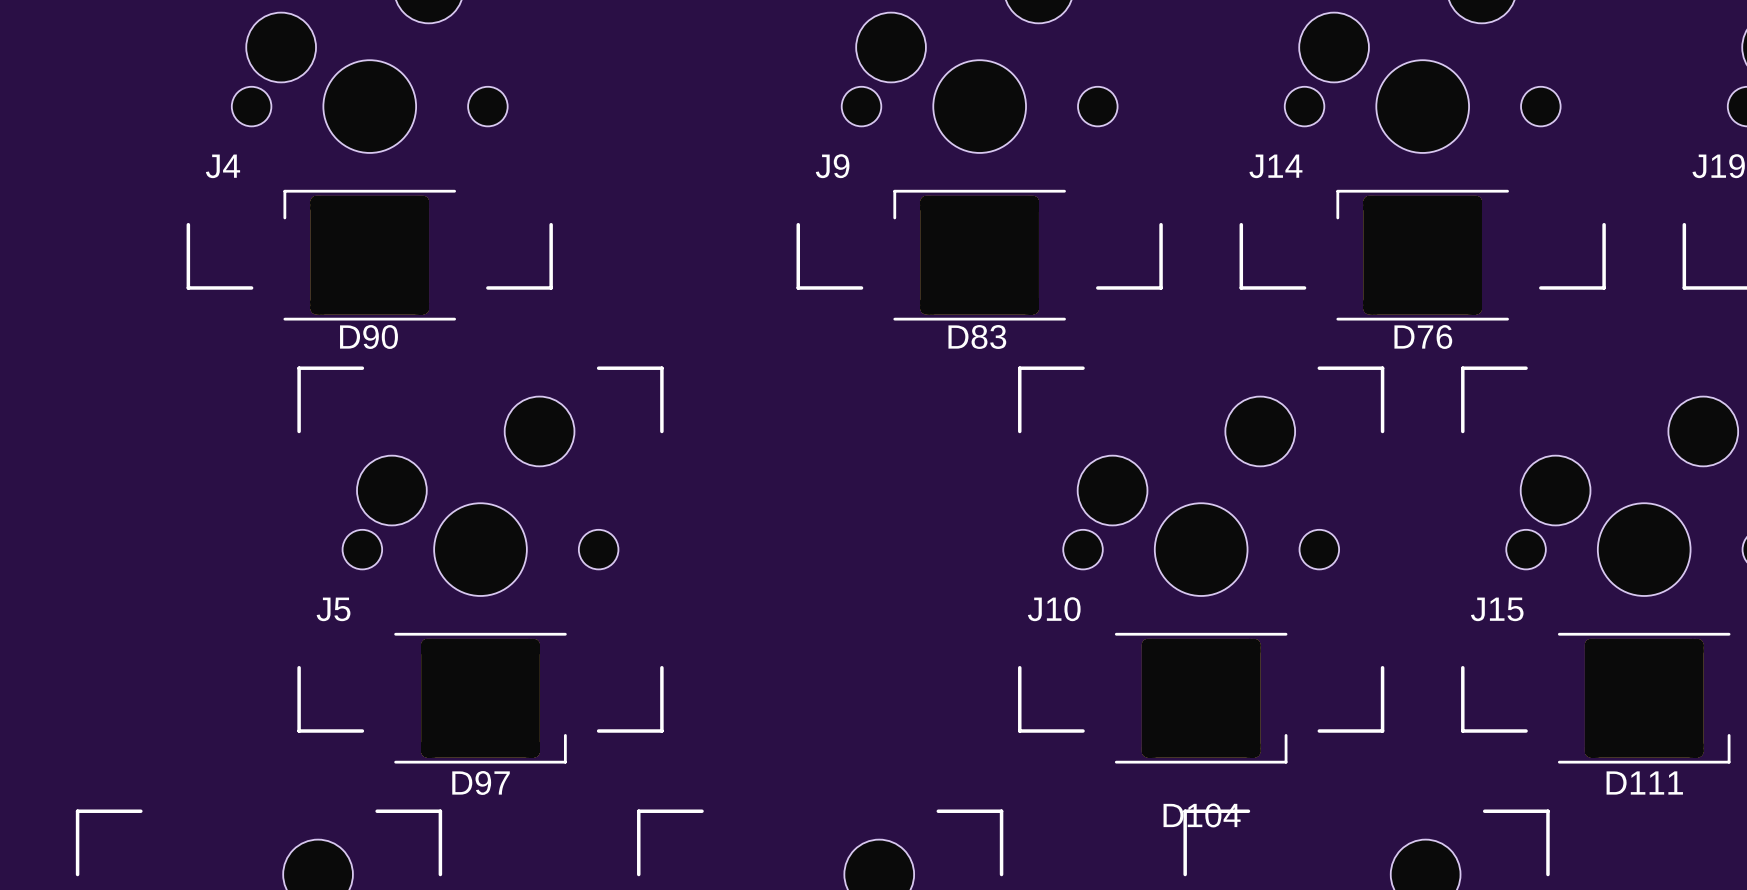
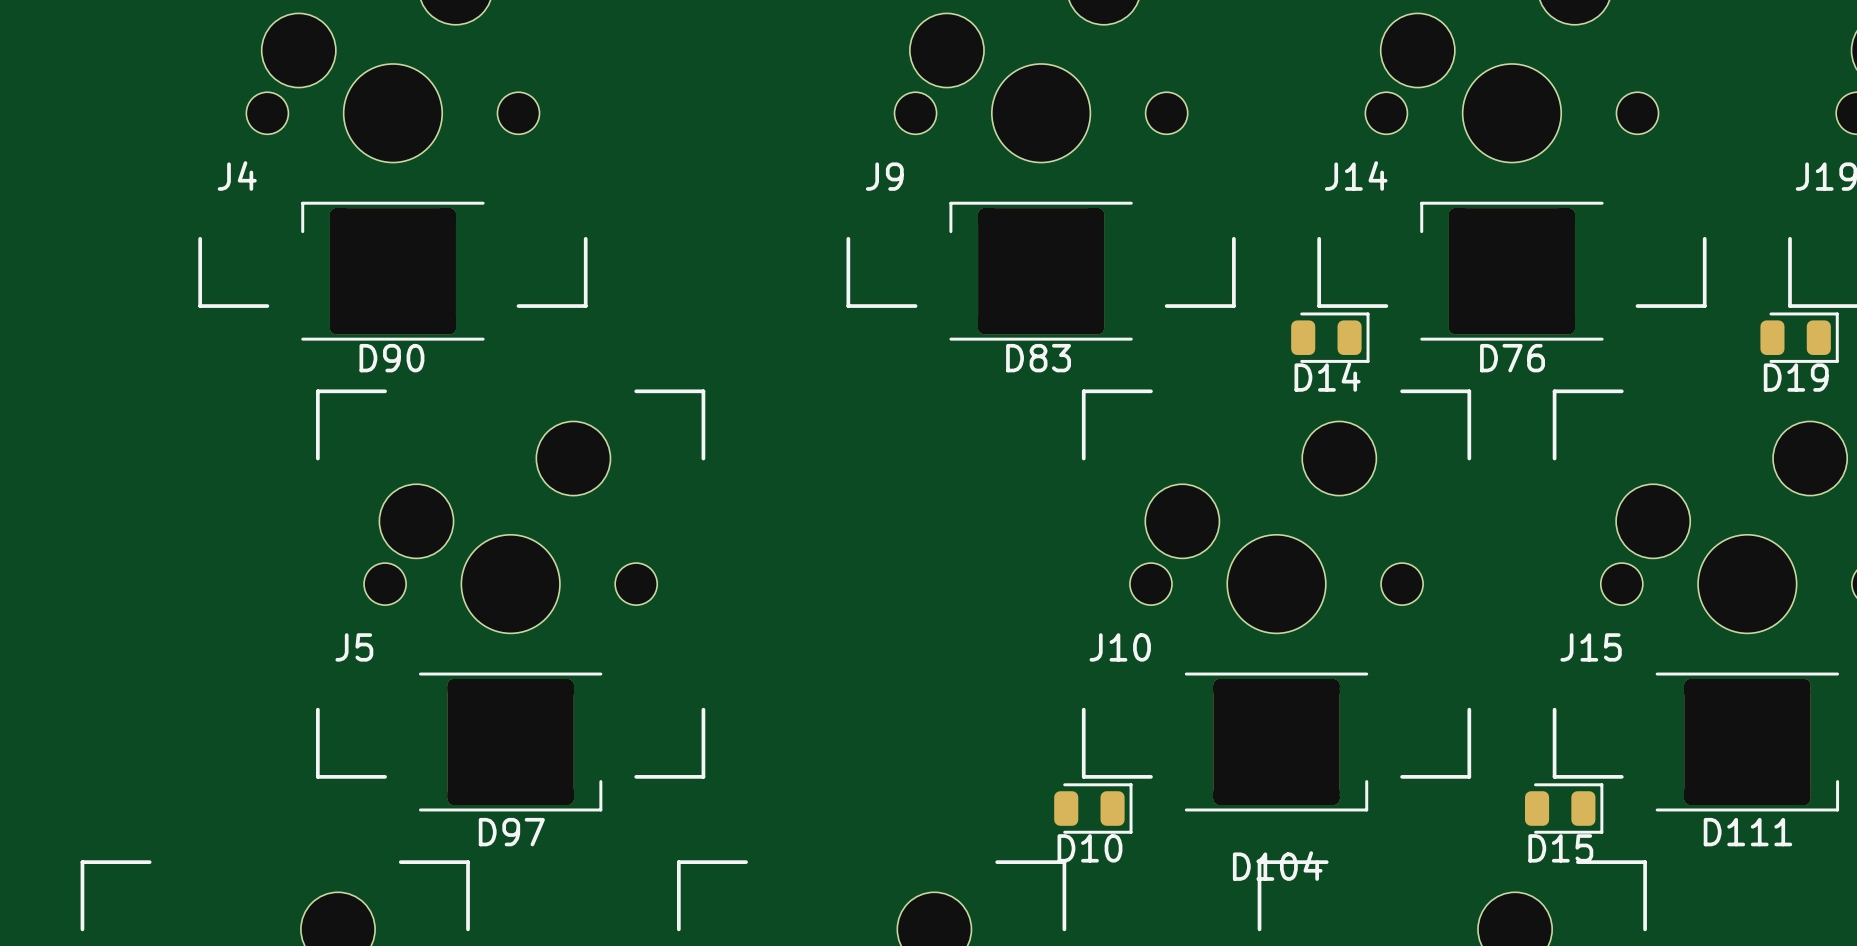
D14: none -> (1330, 337)
D19: none -> (1799, 337)
D10: none -> (1093, 808)
D15: none -> (1564, 808)

